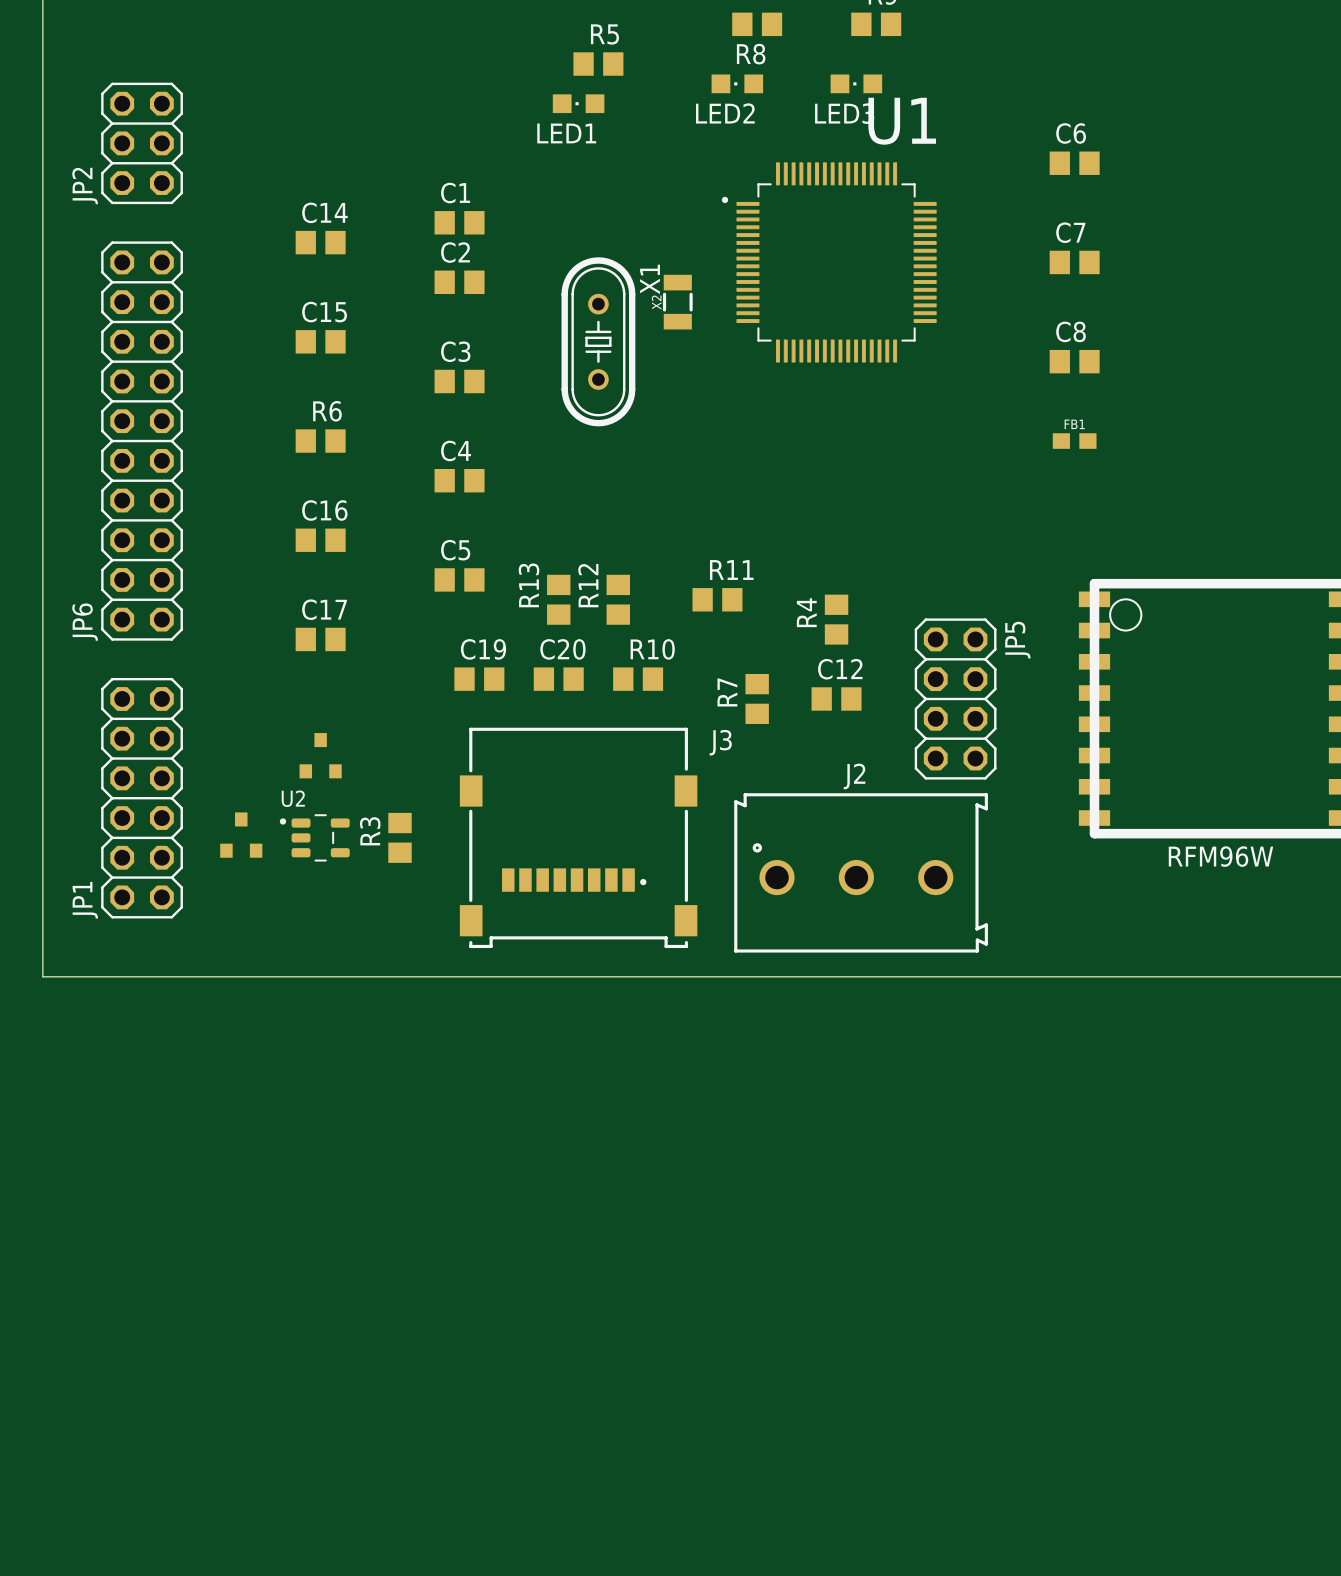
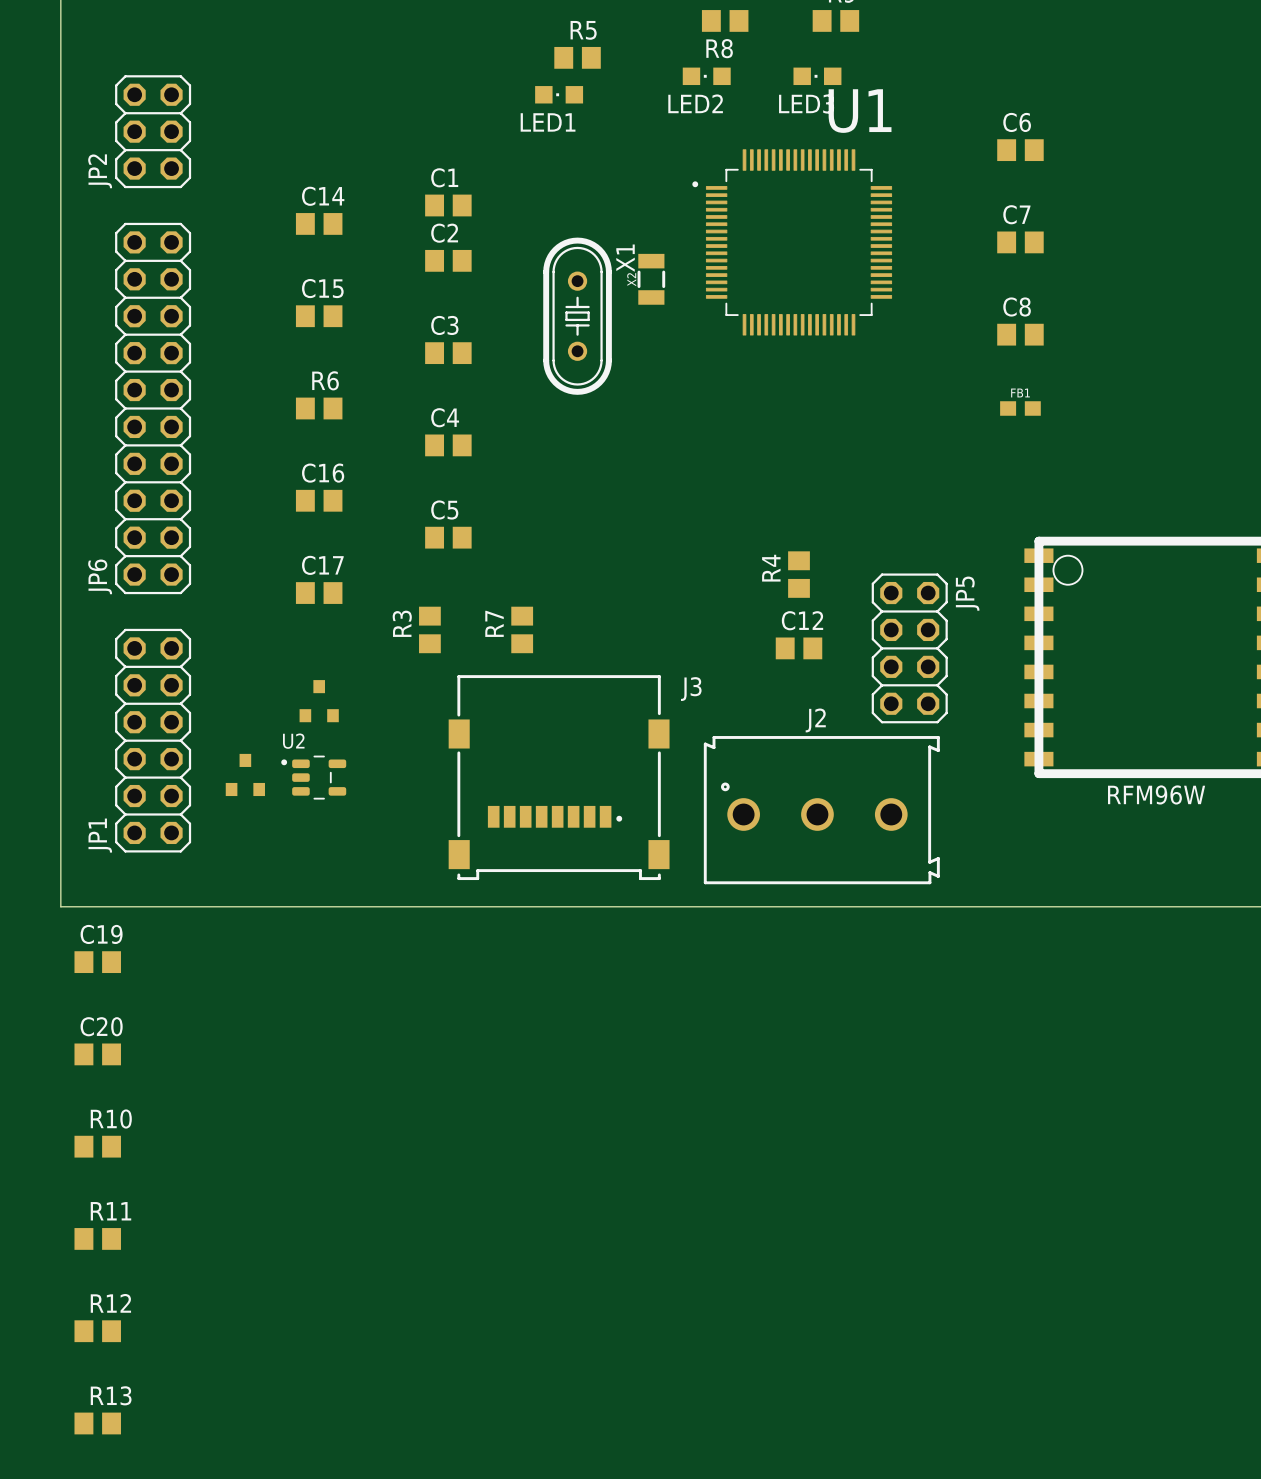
R13 rotation: 0° (558, 599) -> 90° clockwise (97, 1423)
R13 position: (558, 599) -> (97, 1423)
R12 rotation: 0° (618, 599) -> 90° clockwise (97, 1331)
R12 position: (618, 599) -> (97, 1331)
R11 position: (717, 599) -> (97, 1238)
C19 position: (479, 679) -> (97, 962)
C20 position: (558, 679) -> (97, 1054)
R10 position: (638, 679) -> (97, 1146)
R7 position: (757, 698) -> (522, 629)
R3 position: (400, 837) -> (429, 629)

